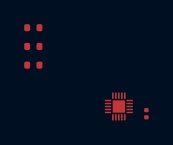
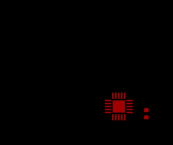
part: (33, 27) -> none
part: (33, 46) -> none
part: (33, 65) -> none

